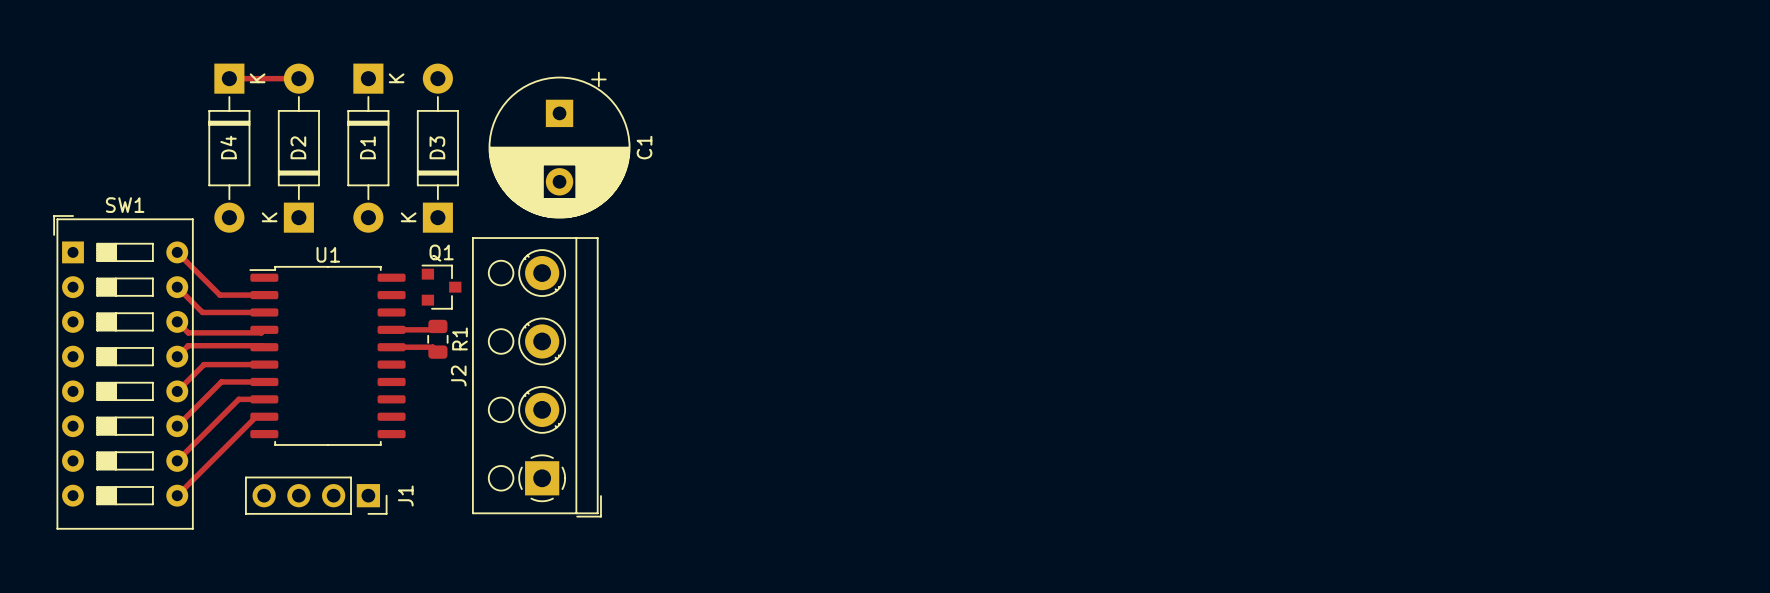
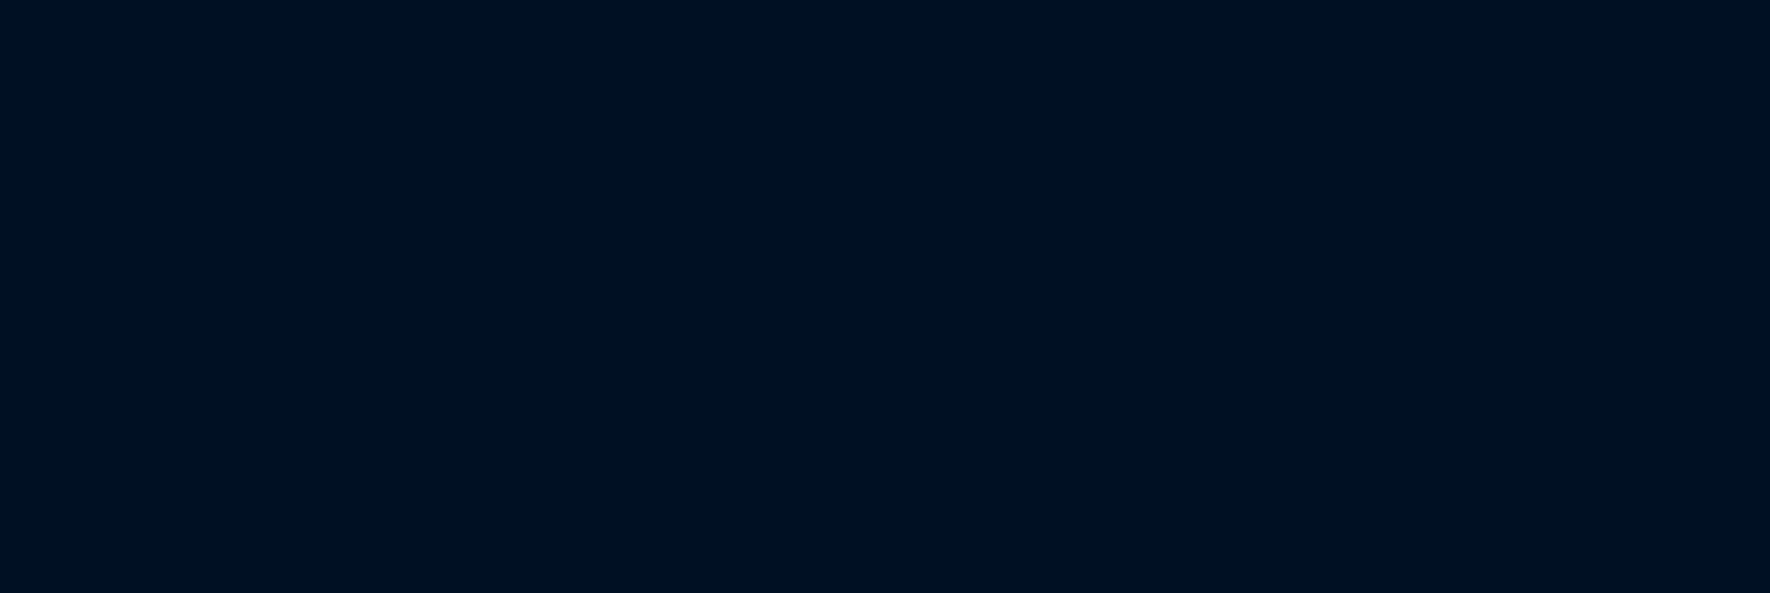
track: (229, 78) (298, 78) -> none
C1: (559, 145) -> none
D4: (229, 148) -> none
D2: (298, 148) -> none
D1: (368, 148) -> none
D3: (437, 148) -> none
track: (177, 252) (219, 295) (264, 295) -> none
track: (177, 287) (202, 312) (264, 312) -> none
Q1: (441, 287) -> none
track: (177, 321) (188, 332) (261, 332) (264, 329) -> none
track: (437, 326) (434, 329) (391, 329) -> none
R1: (437, 339) -> none
track: (264, 347) (188, 345) (177, 356) -> none
track: (391, 347) (433, 347) (437, 352) -> none
U1: (327, 355) -> none
track: (264, 364) (204, 364) (177, 391) -> none
SW1: (123, 372) -> none
J2: (536, 377) -> none
track: (264, 381) (221, 381) (177, 426) -> none
track: (264, 399) (238, 399) (177, 460) -> none
track: (264, 416) (256, 416) (177, 495) -> none
J1: (316, 495) -> none

